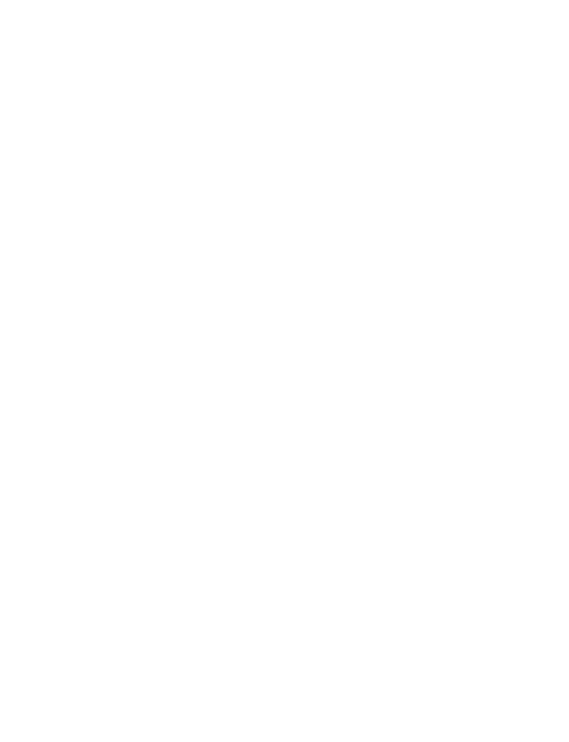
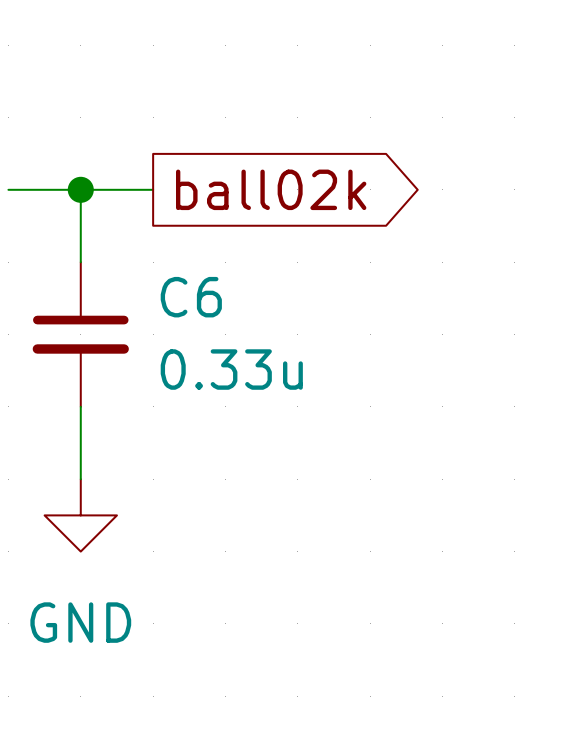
wire: none -> (8, 189) (153, 189)
wire: none -> (80, 189) (80, 262)
junction: none -> (80, 189)
global label: none -> ball02k (271, 189)
C6: none -> 0.33u (80, 334)
wire: none -> (80, 406) (80, 479)
power symbol: none -> GND (80, 515)

